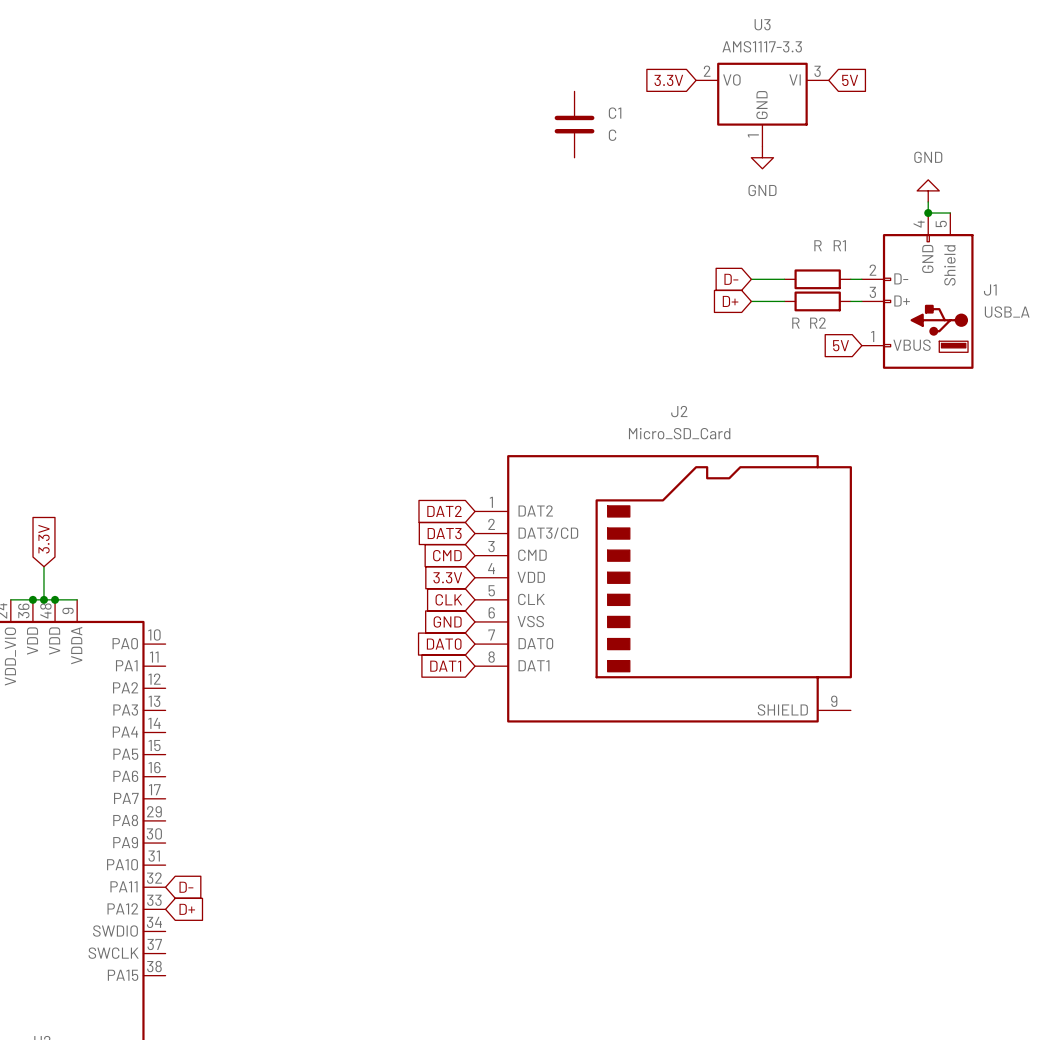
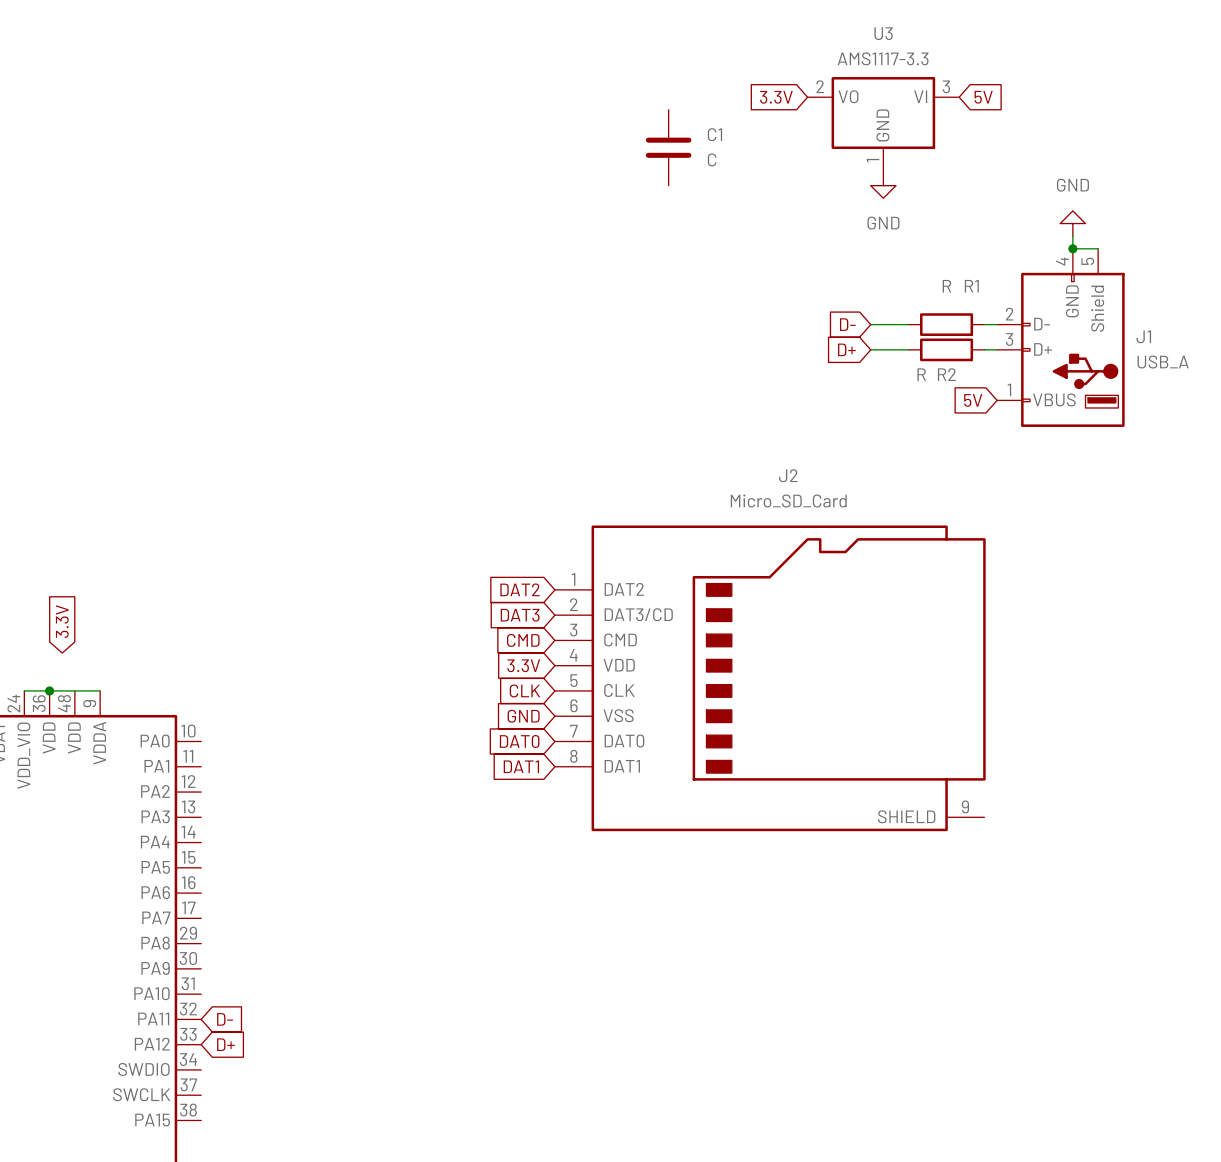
wire: (43, 566) (43, 599) -> none
junction: (43, 599) -> none
junction: (55, 599) -> none

